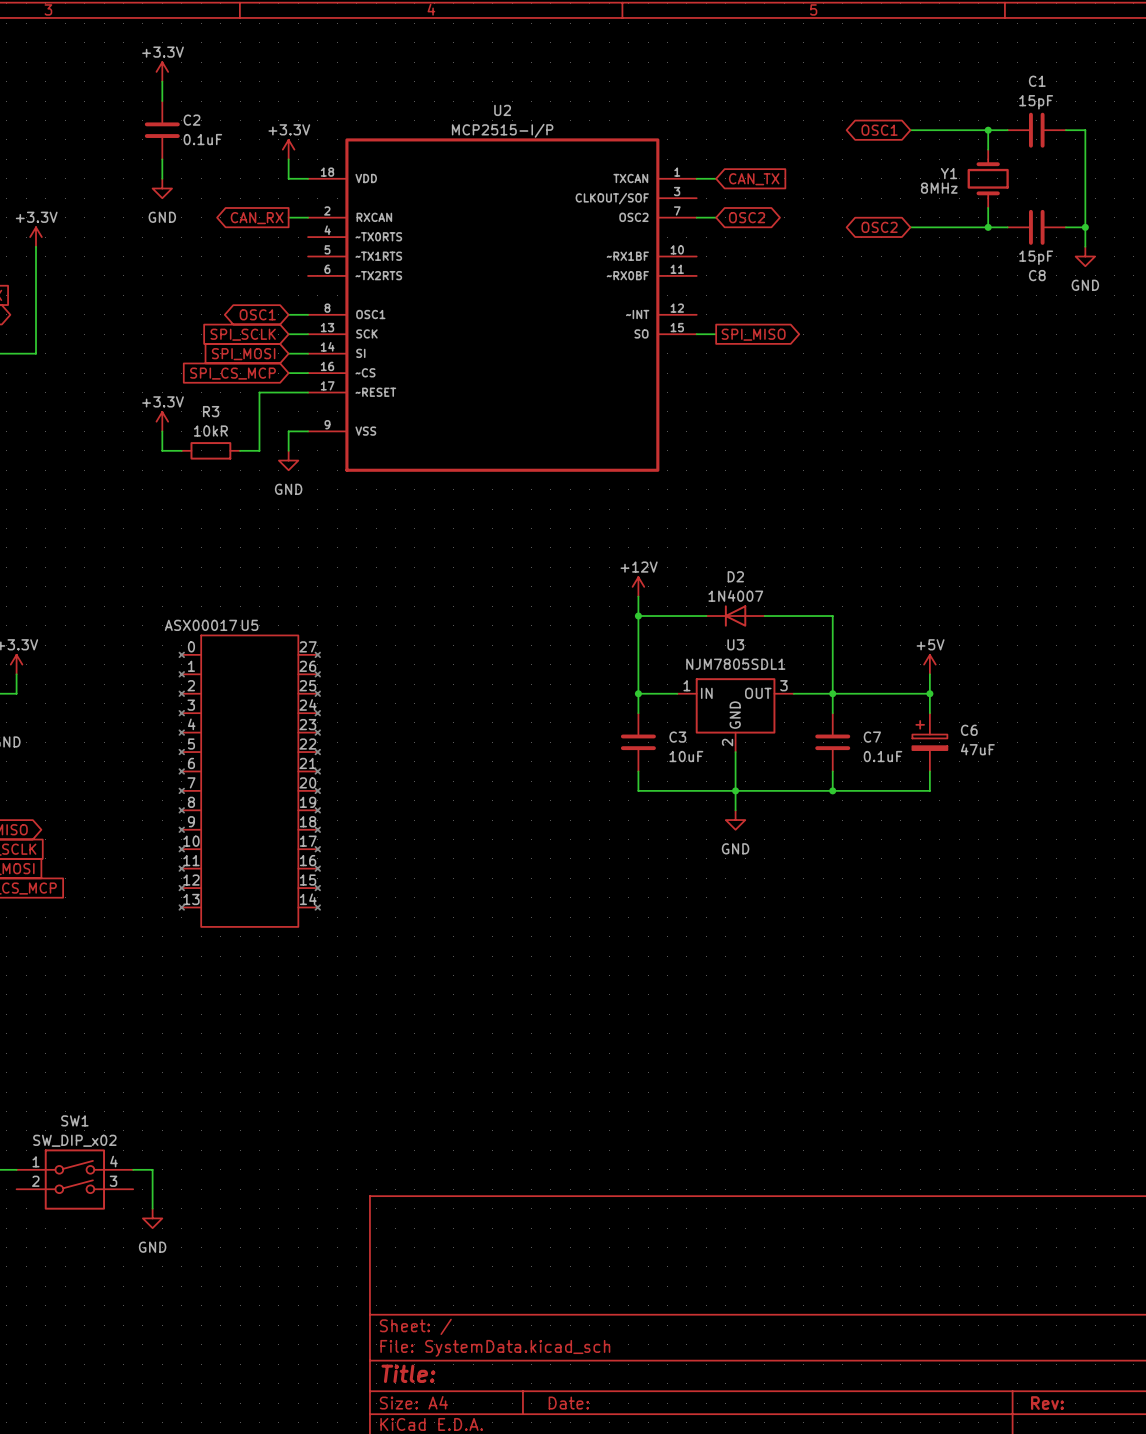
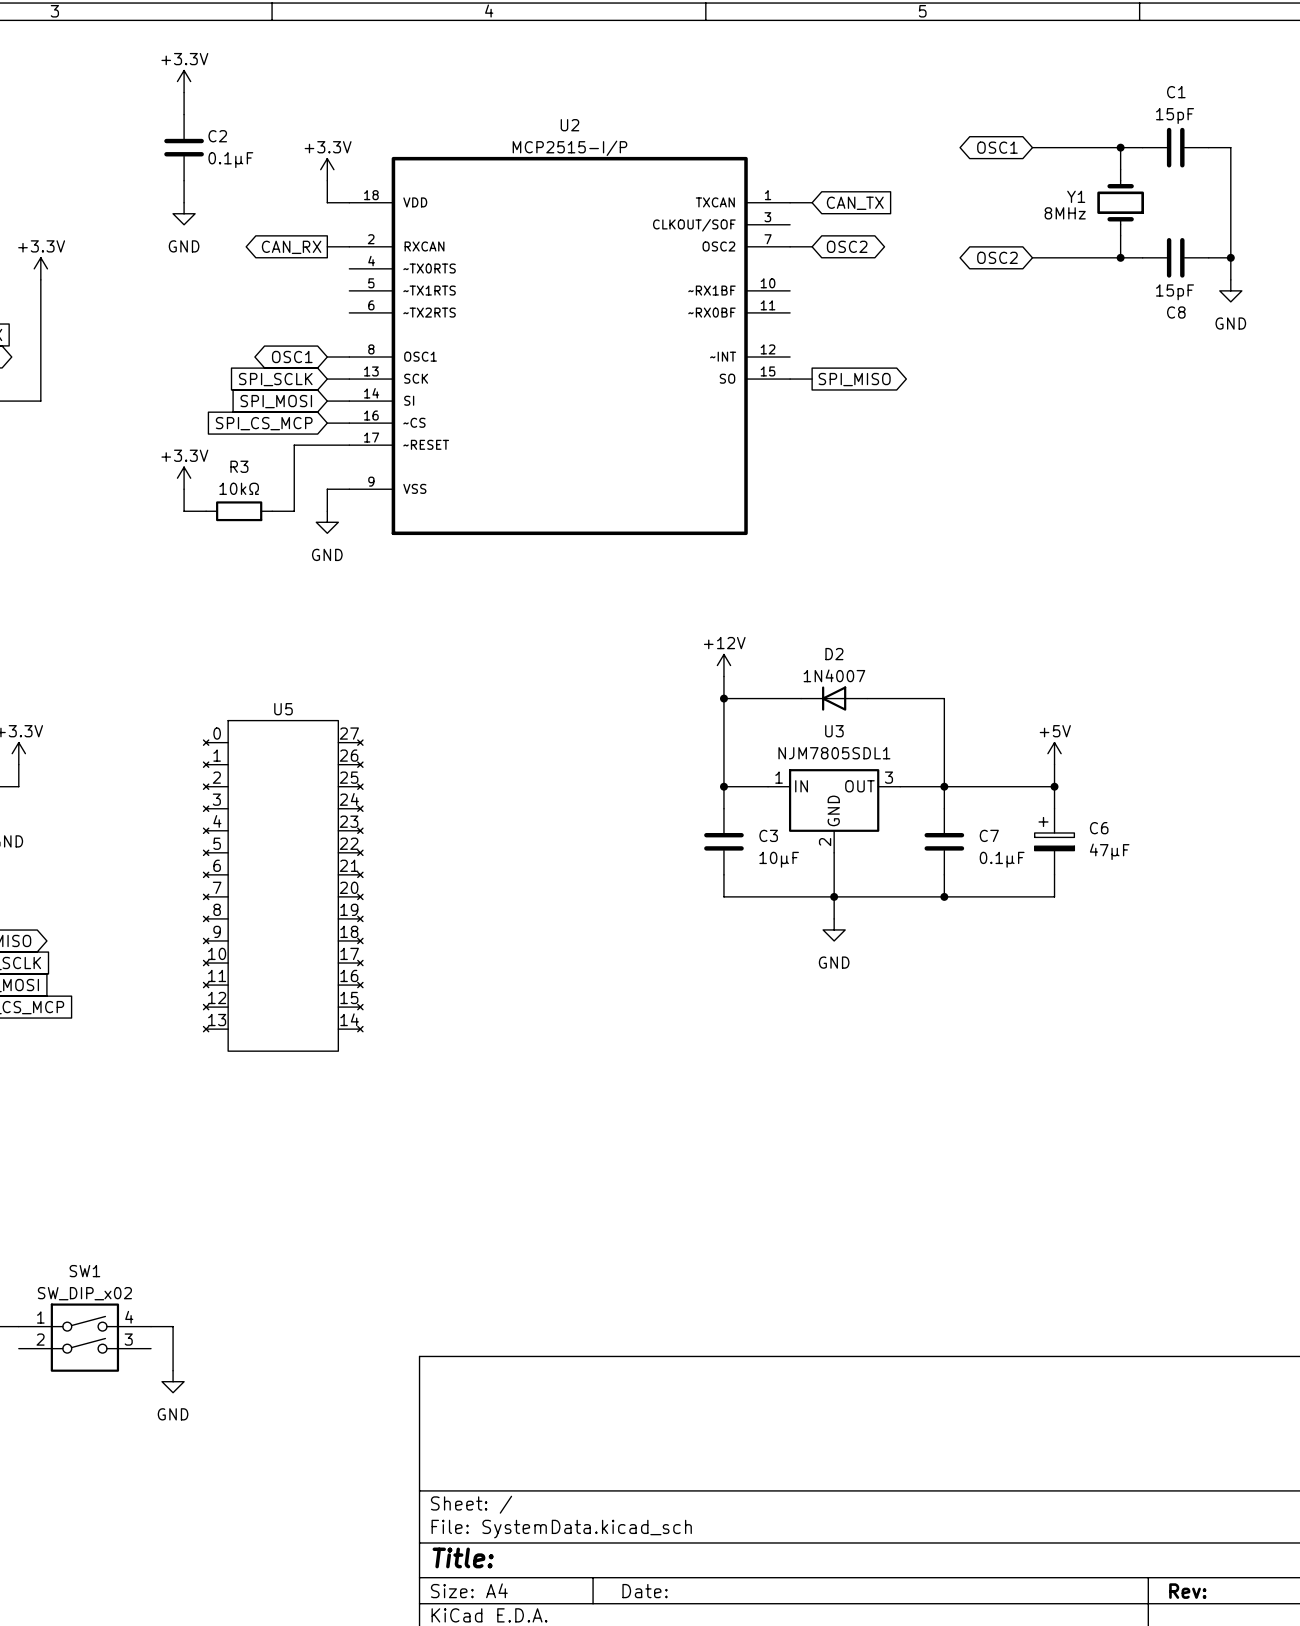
C2 value: 0.1uF (202, 139) -> 0.1μF (230, 160)
R3 value: 10kR (210, 431) -> 10kΩ (239, 488)
U5 value: ASX00017 (200, 625) -> none
C6 value: 47uF (977, 749) -> 47μF (1109, 851)
C3 value: 10uF (686, 756) -> 10μF (779, 859)
C7 value: 0.1uF (883, 756) -> 0.1μF (1002, 859)

